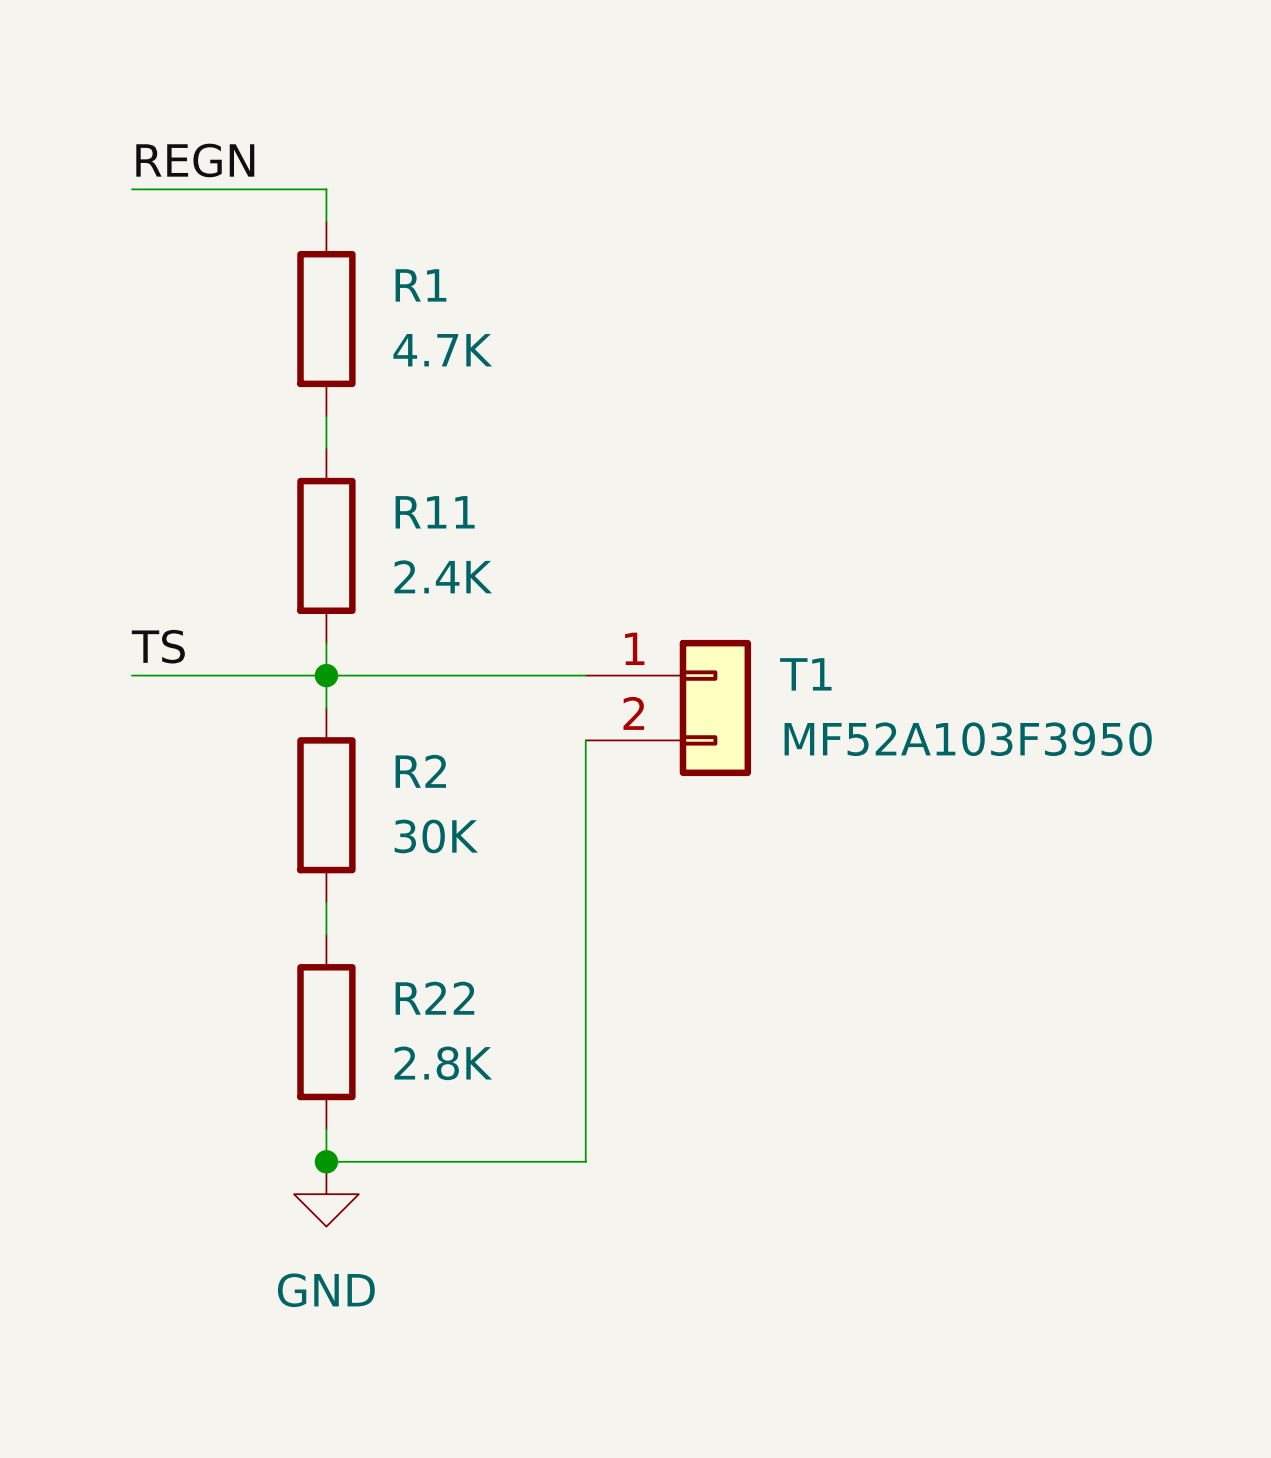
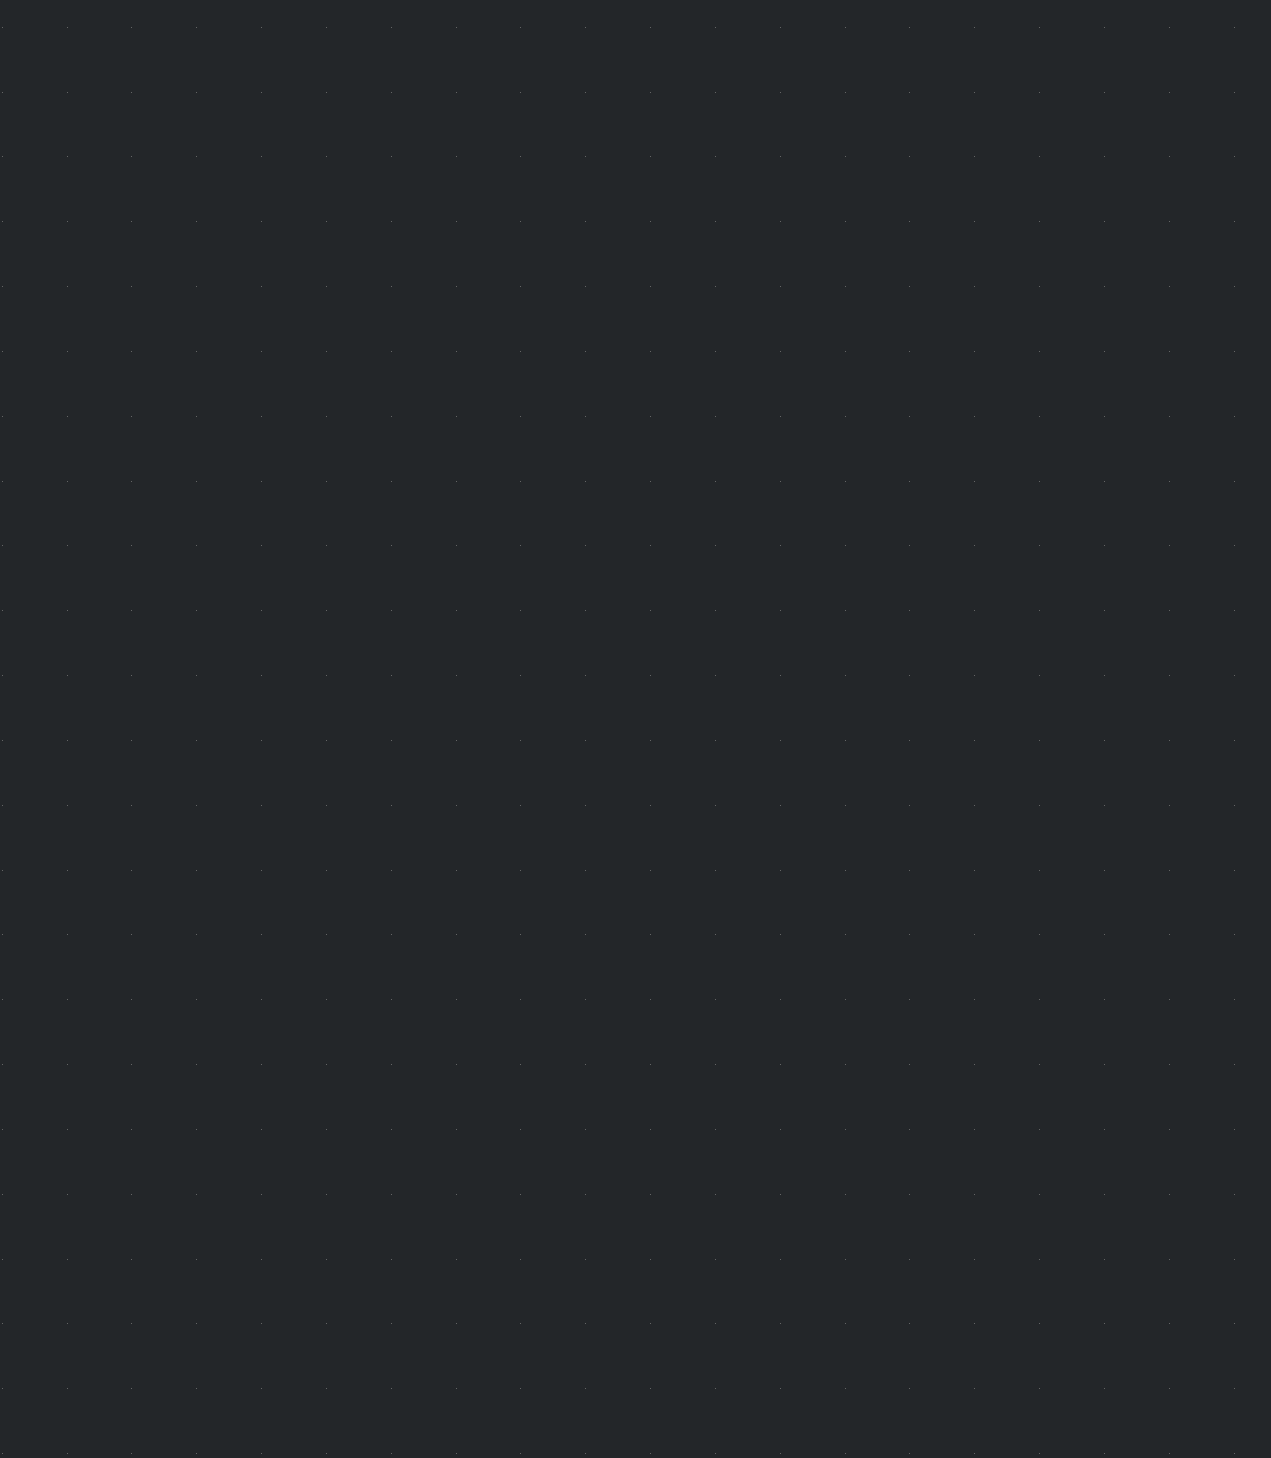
label: REGN (195, 160) -> none
wire: (131, 189) (326, 189) (326, 221) -> none
R1: 4.7K (326, 319) -> none
wire: (326, 416) (326, 448) -> none
R11: 2.4K (326, 545) -> none
wire: (326, 643) (326, 707) -> none
label: TS (158, 646) -> none
wire: (131, 675) (585, 675) -> none
junction: (326, 675) -> none
T1: MF52A103F3950 (668, 707) -> none
wire: (585, 740) (585, 1161) (326, 1161) (326, 1129) -> none
R2: 30K (326, 805) -> none
wire: (326, 902) (326, 934) -> none
R22: 2.8K (326, 1032) -> none
junction: (326, 1161) -> none
power symbol: GND (326, 1194) -> none

